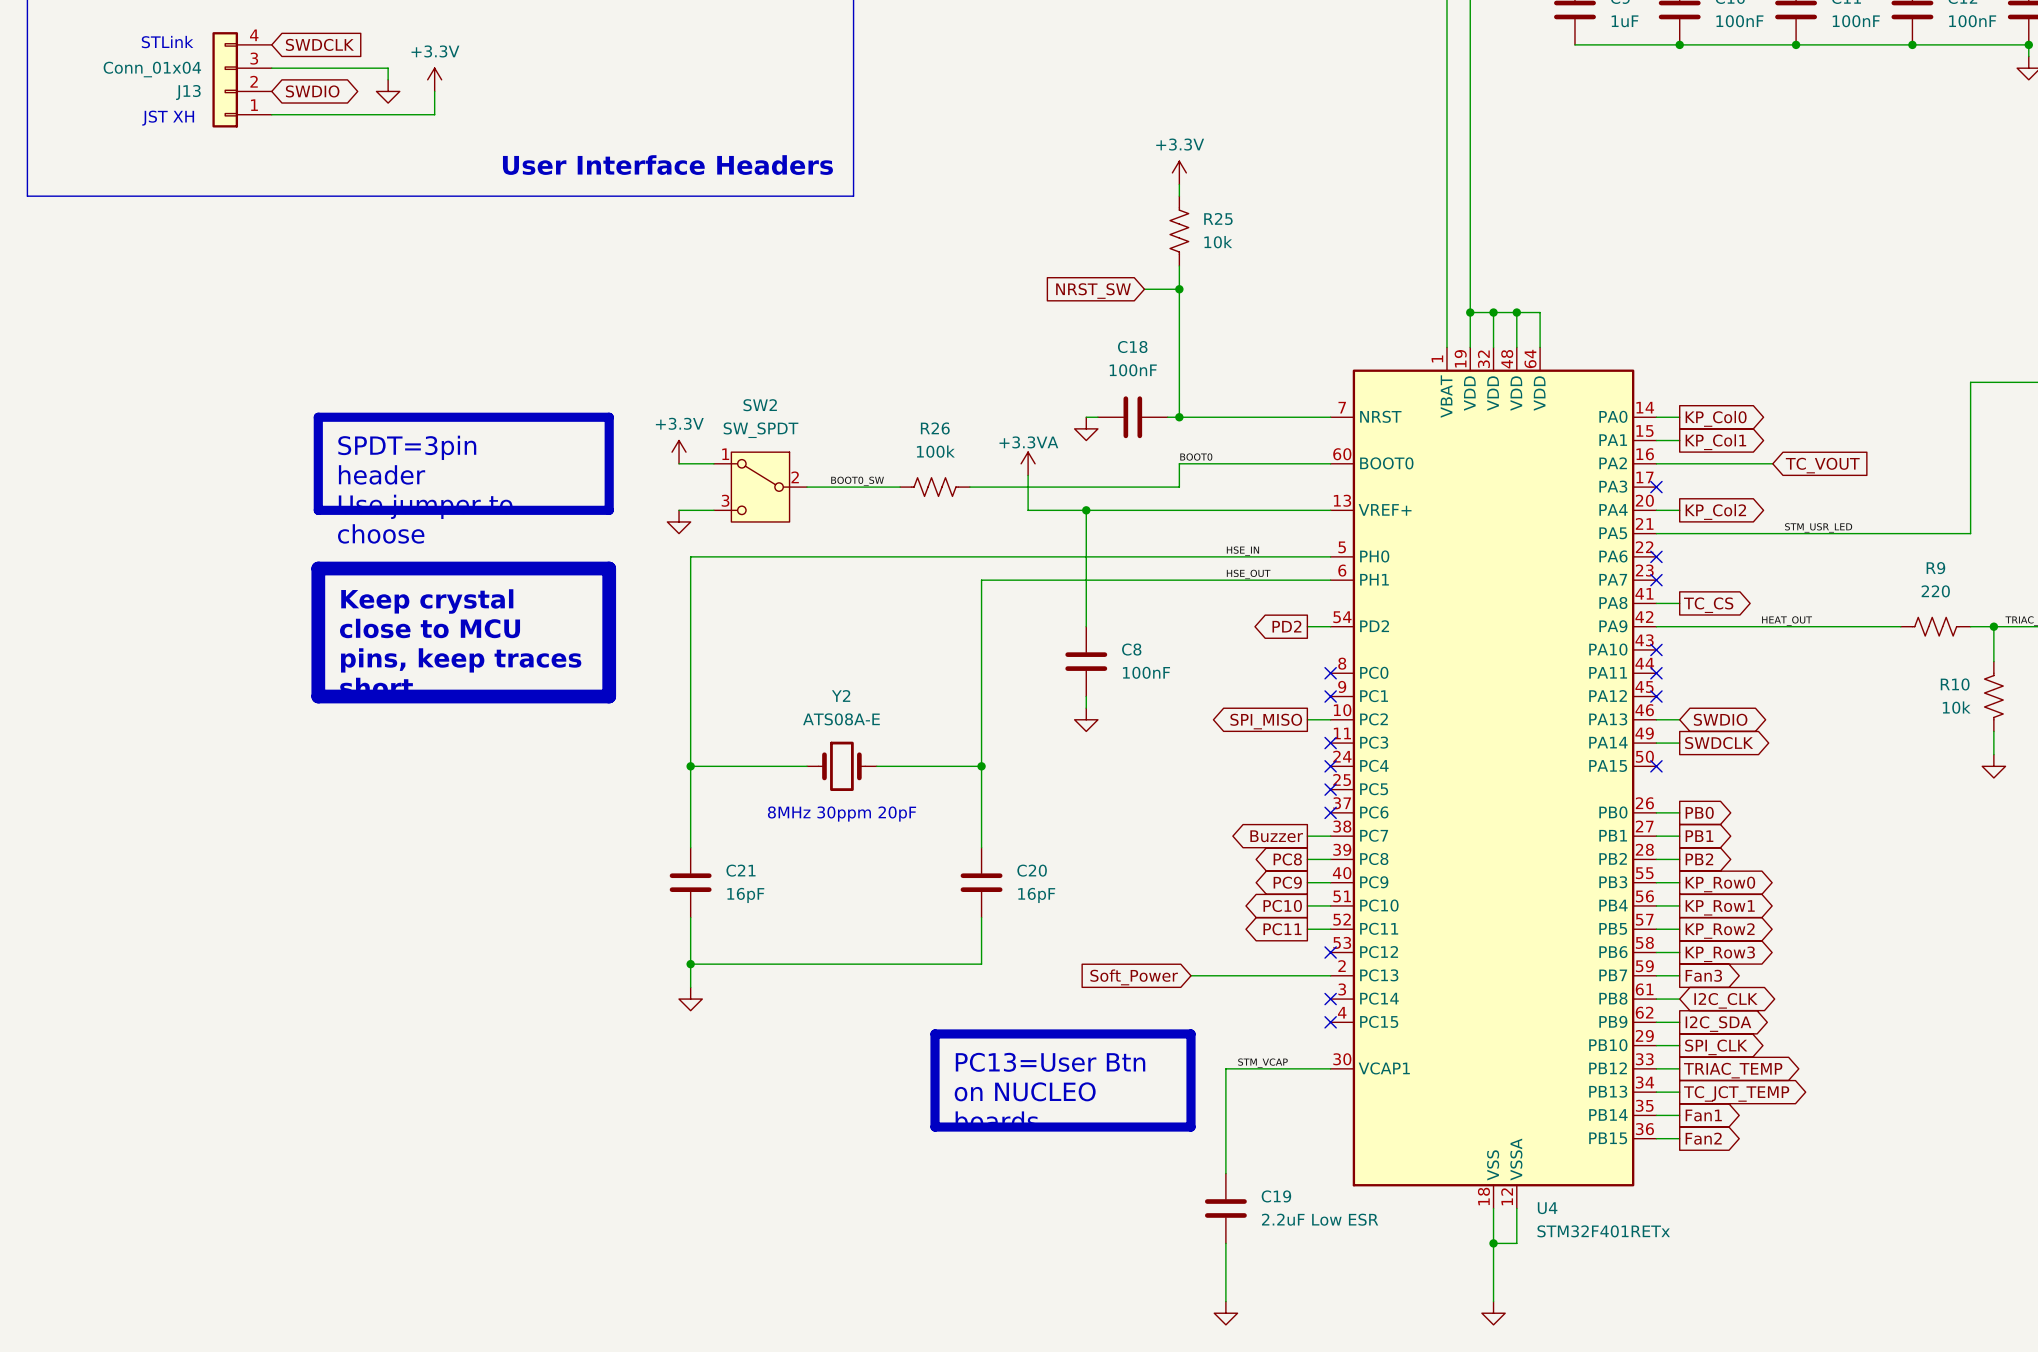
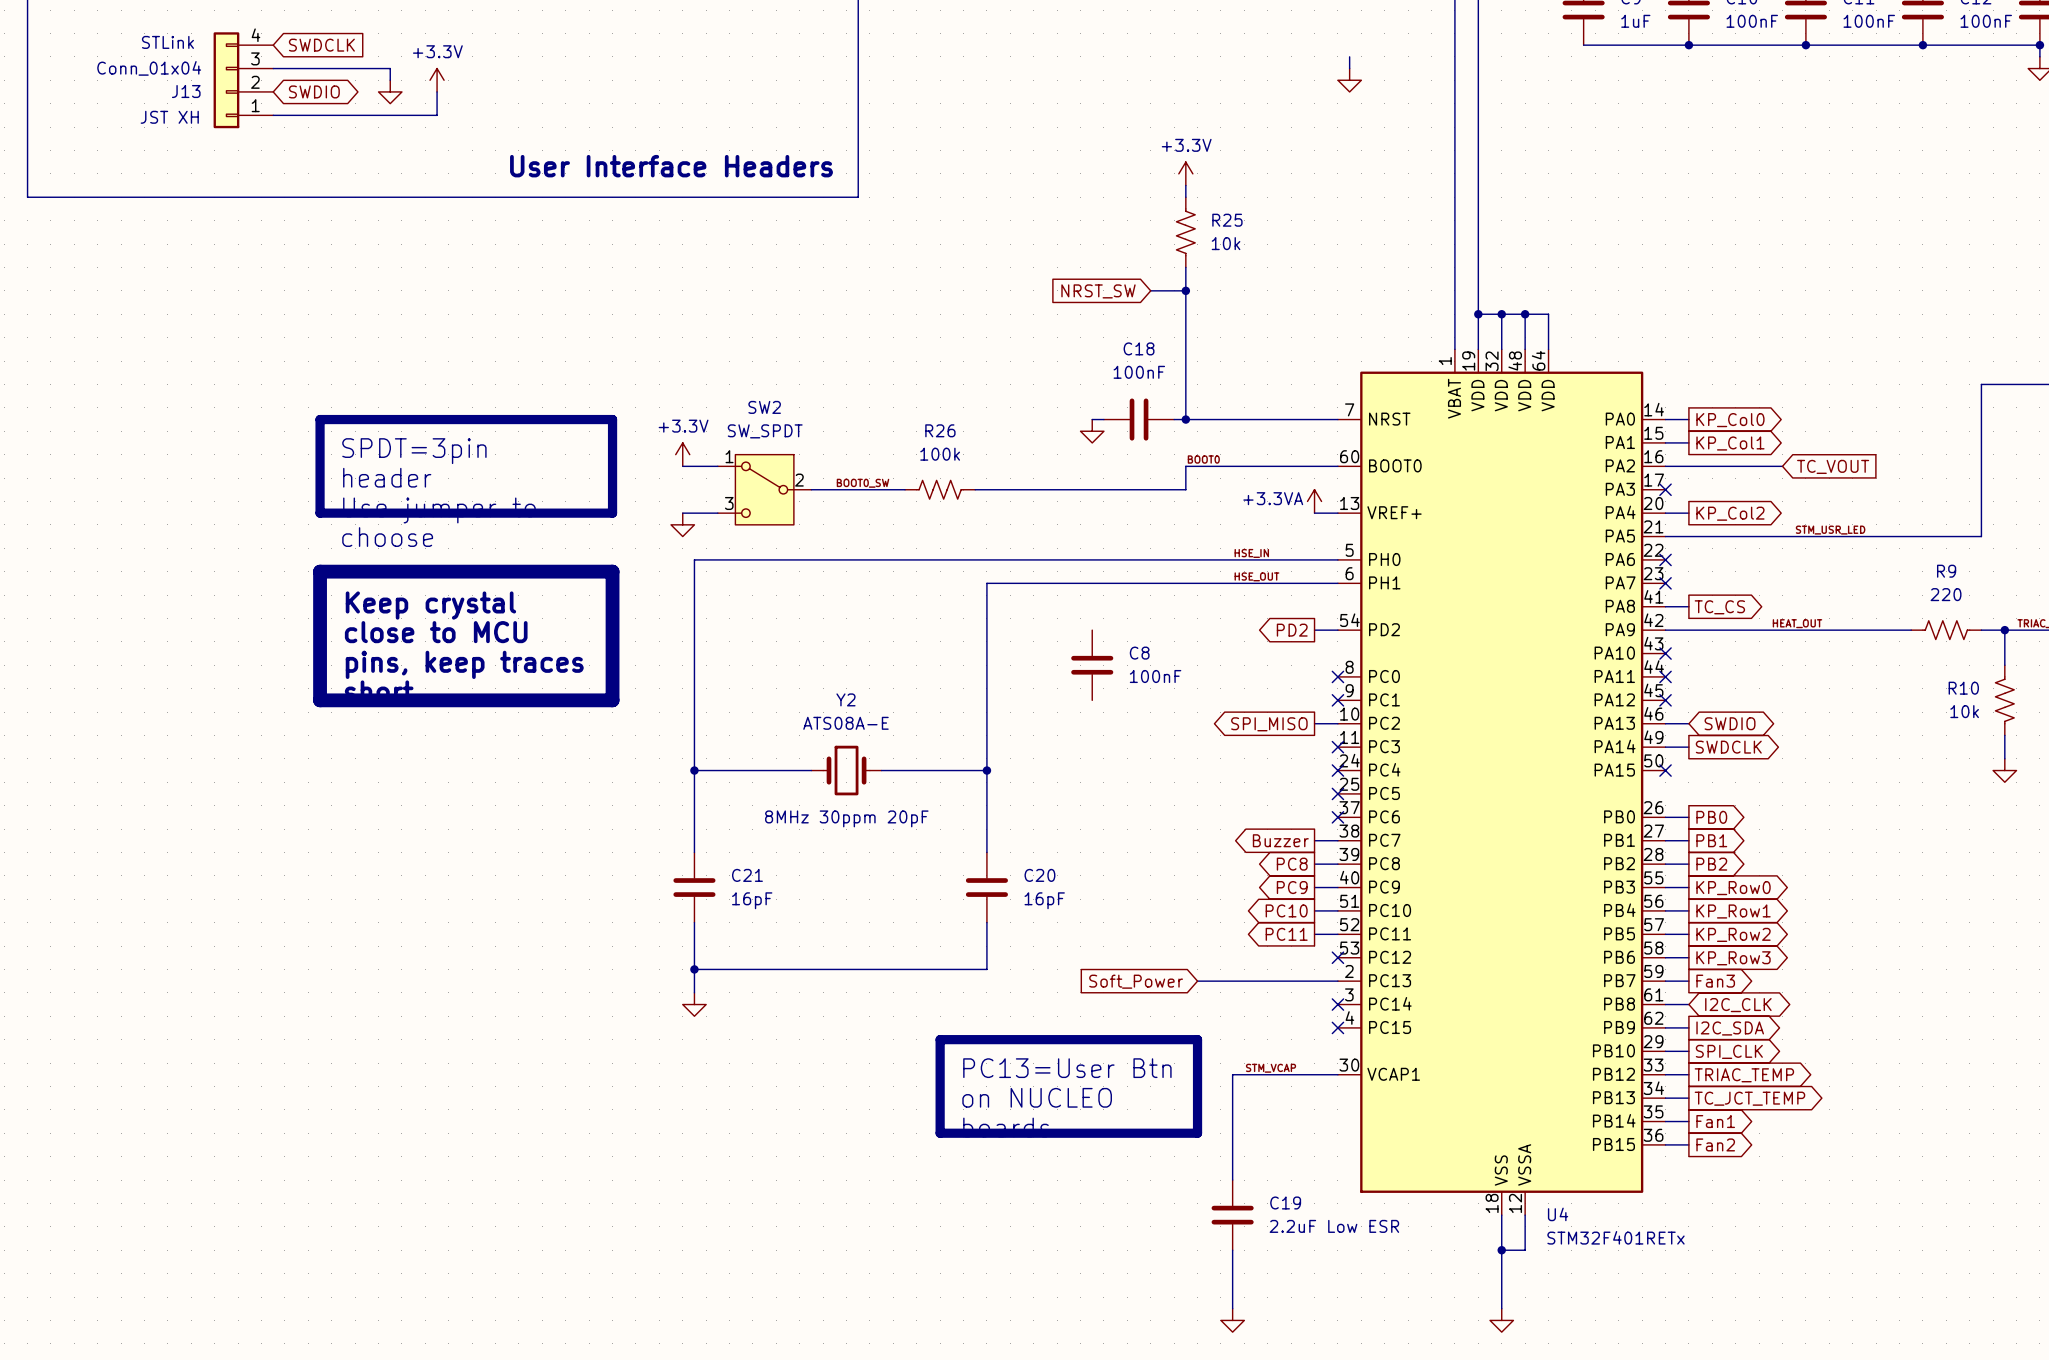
wire: none -> (1349, 56) (1349, 68)
power symbol: none -> (1349, 80)
power symbol: +3.3VA (1028, 463) -> none
wire: (1028, 475) (1028, 510) (1307, 510) -> none
power symbol: none -> +3.3VA (1314, 501)
wire: (1086, 510) (1086, 626) -> none
junction: (1086, 510) -> none
wire: (1086, 696) (1086, 708) -> none
power symbol: (1086, 719) -> none

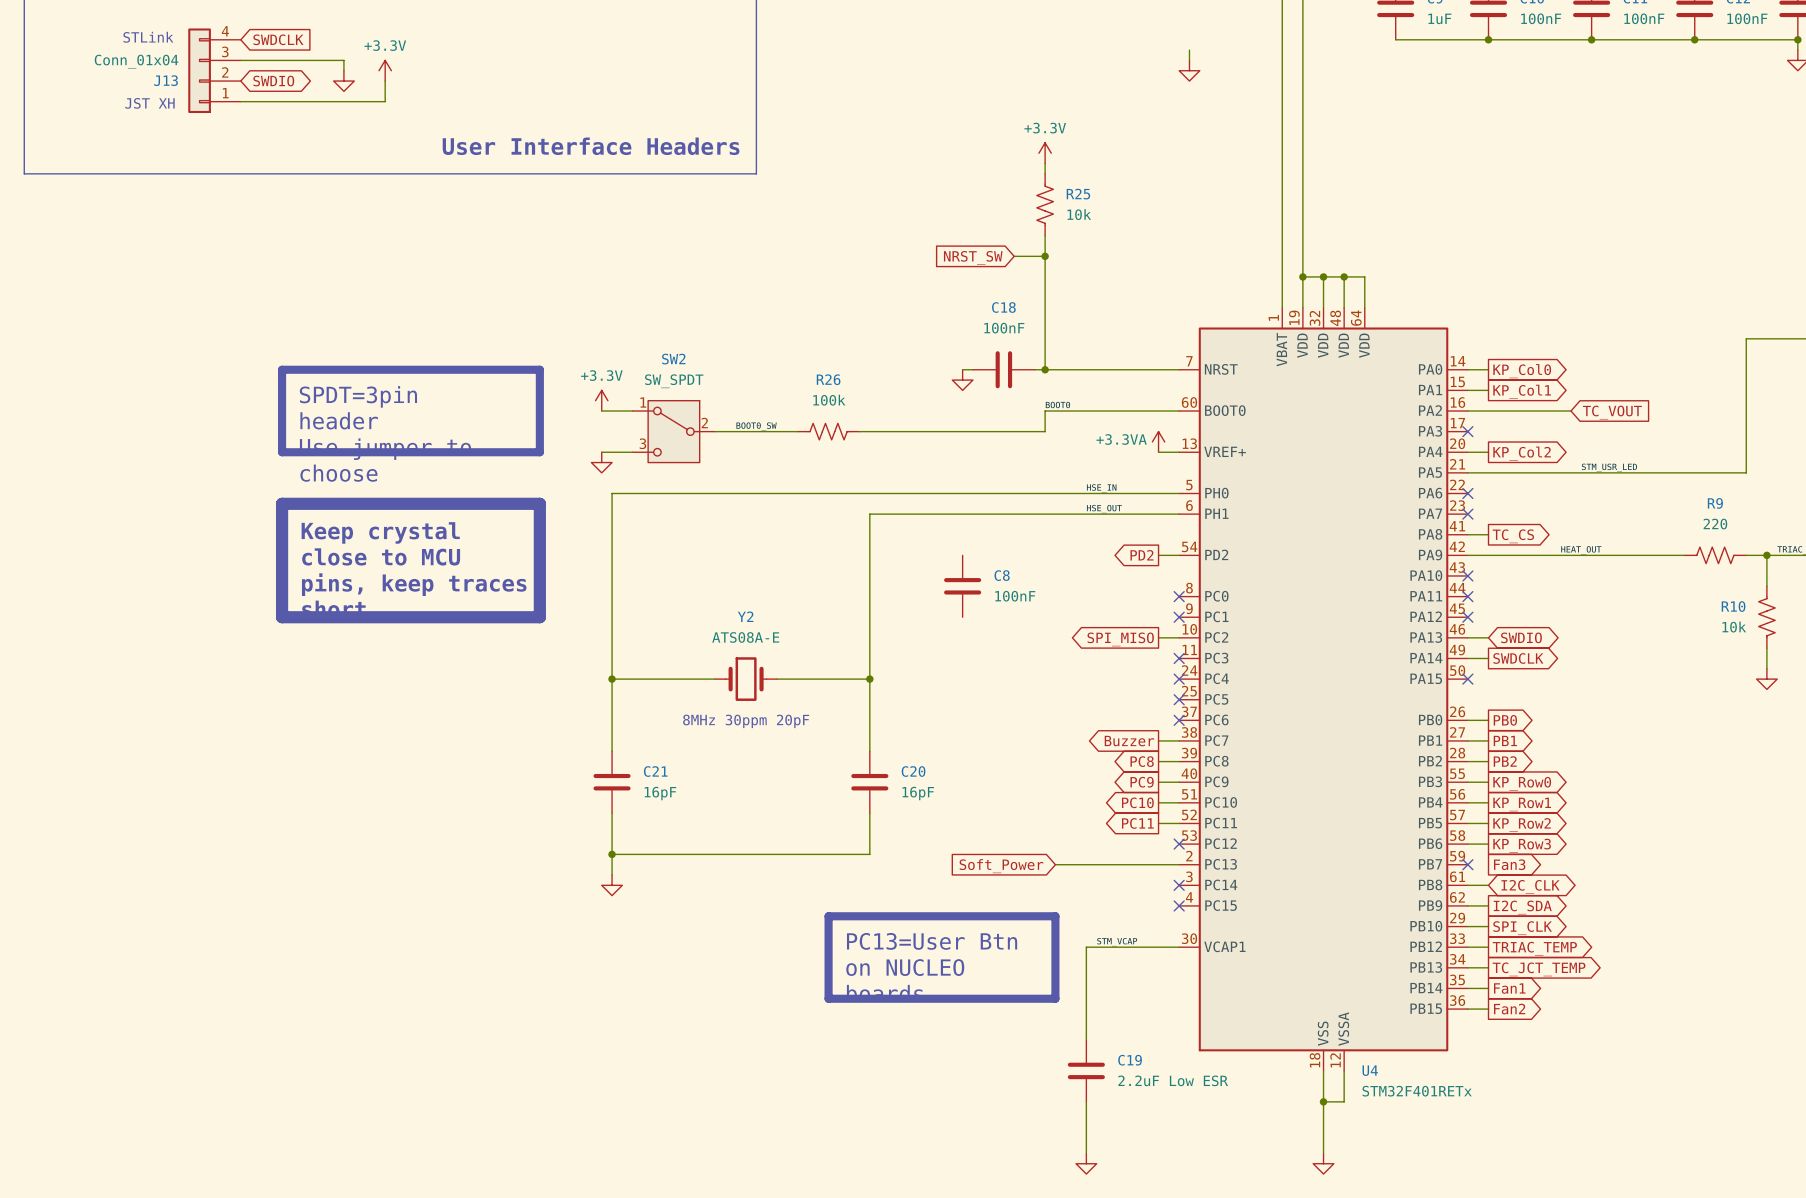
wire: (1665, 981) (1688, 981) -> none
no-connect mark: none -> (1467, 864)

